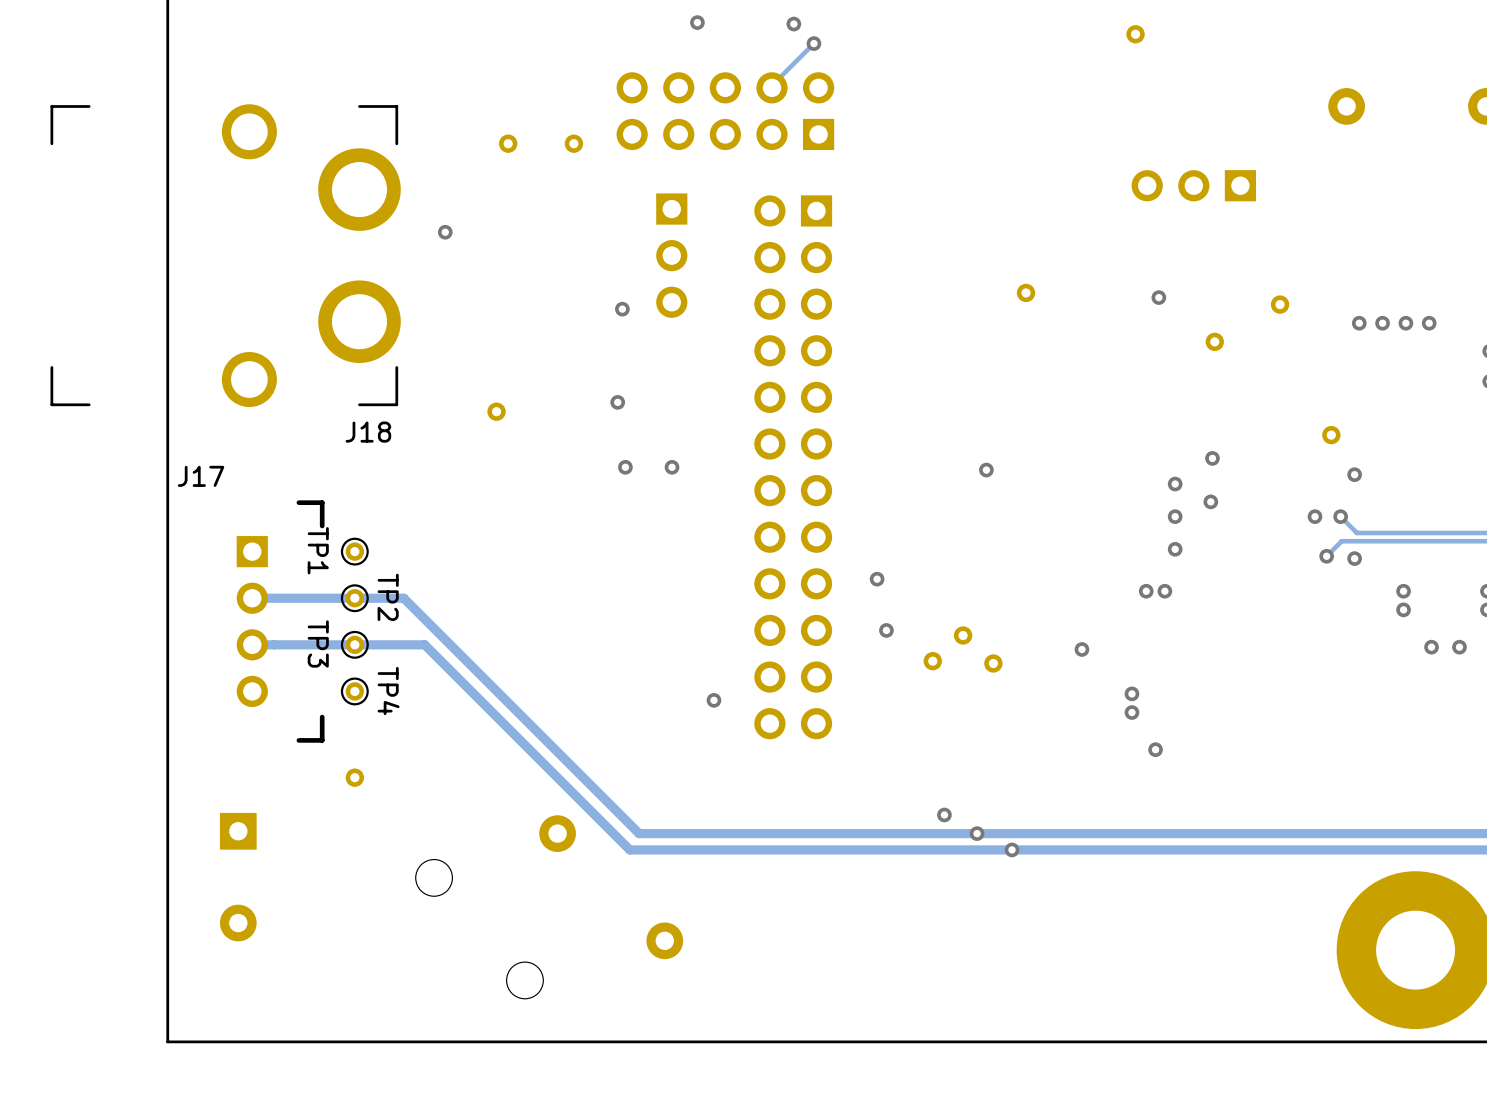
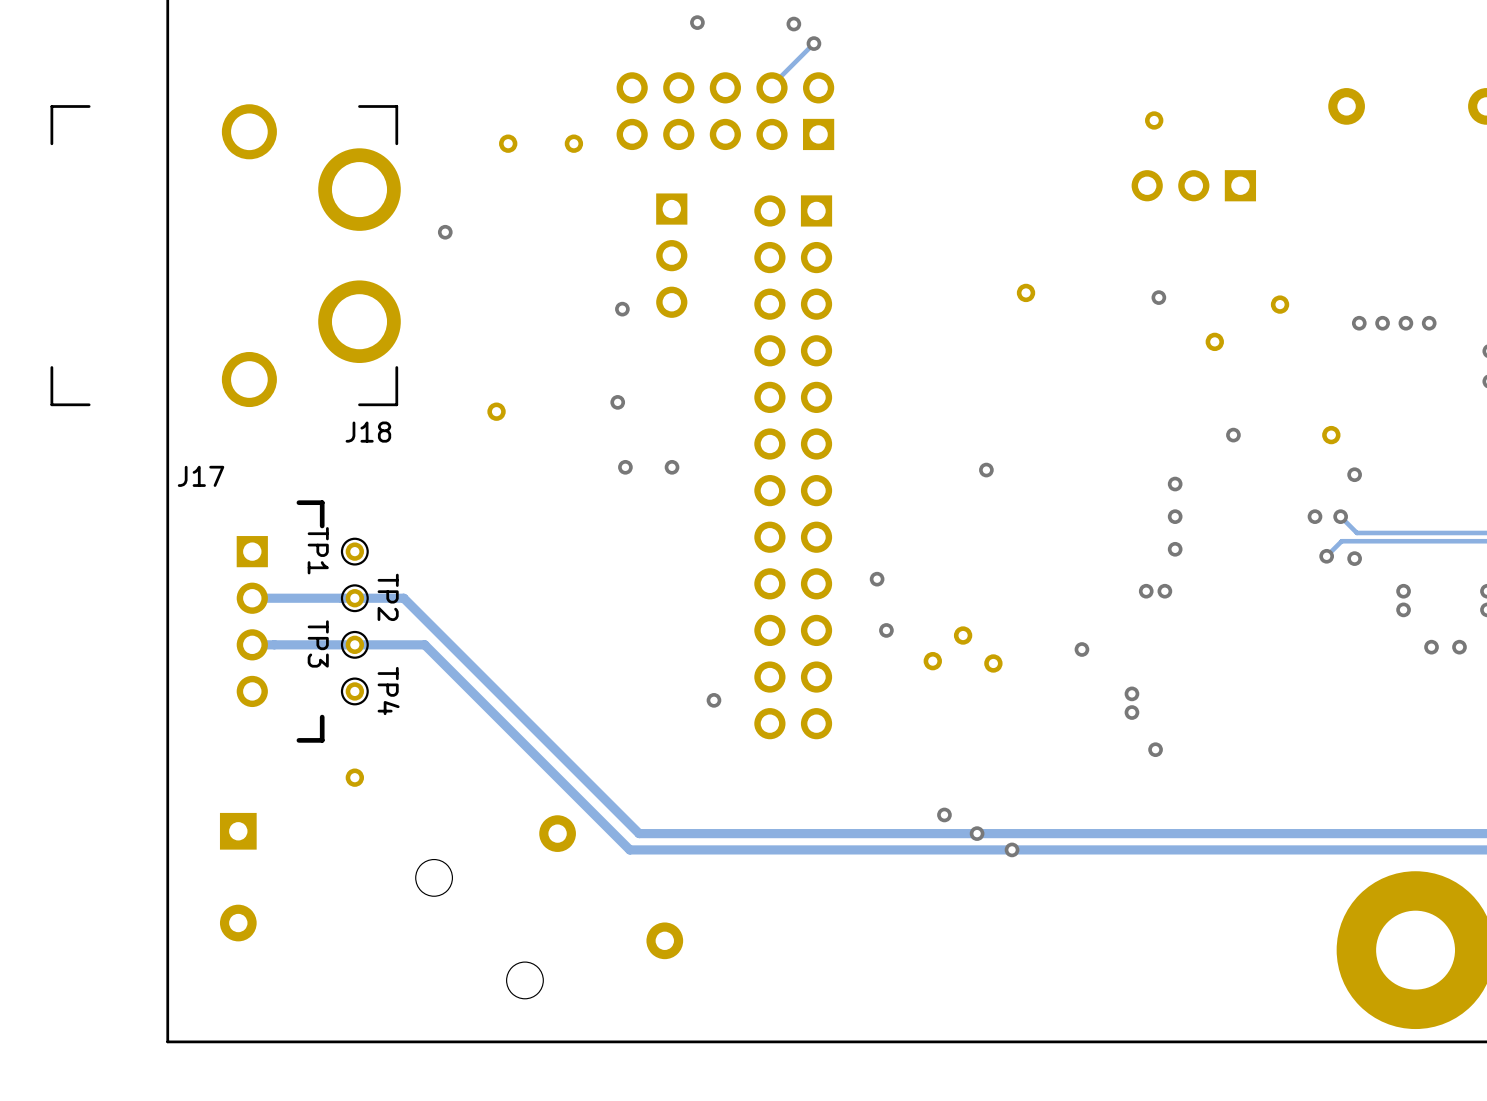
part position: (1135, 34) -> (1154, 120)
via position: (1212, 458) -> (1233, 435)
via: (1210, 501) -> none

